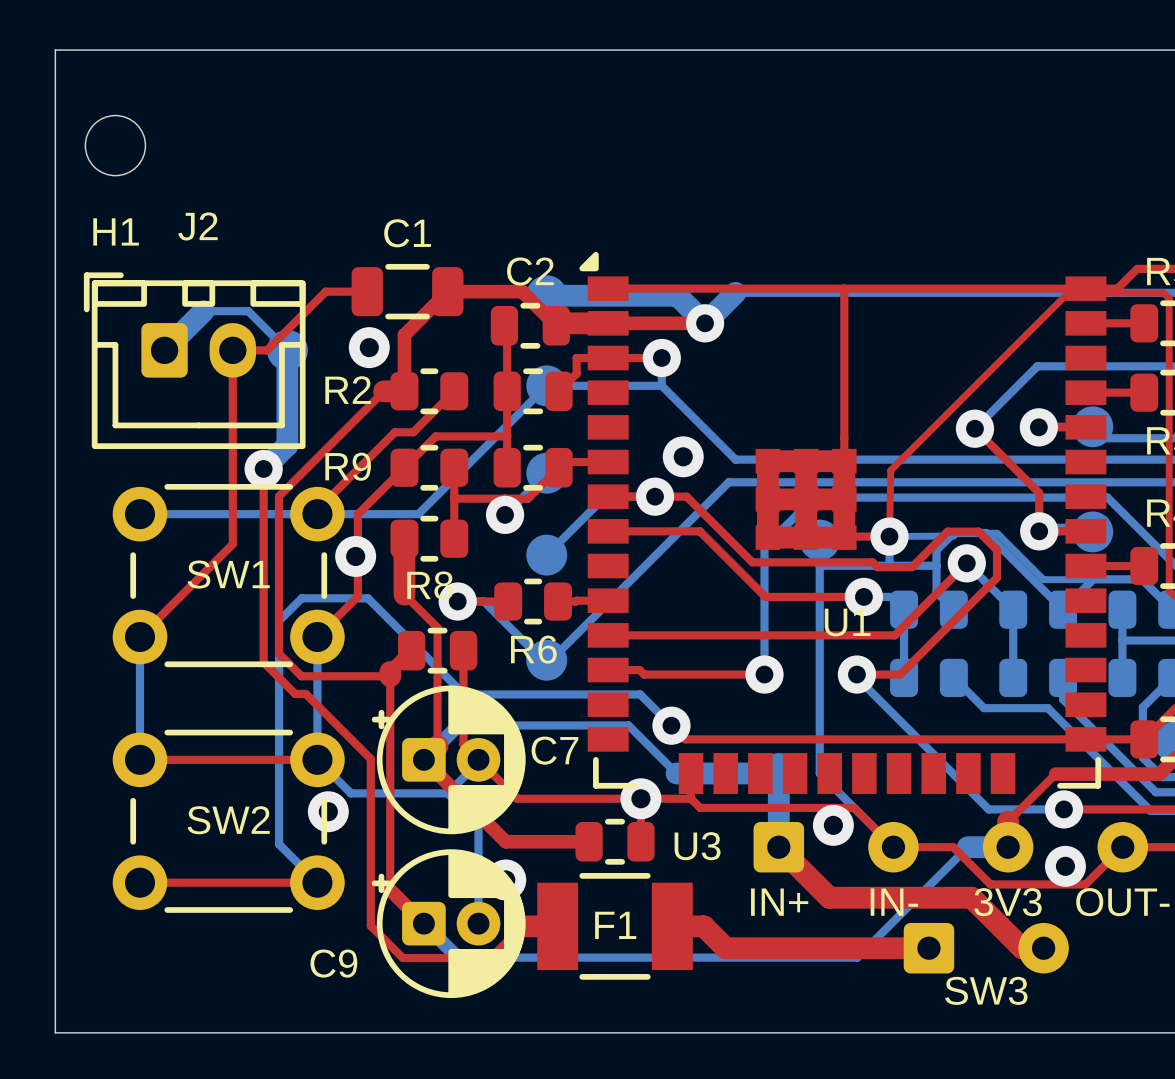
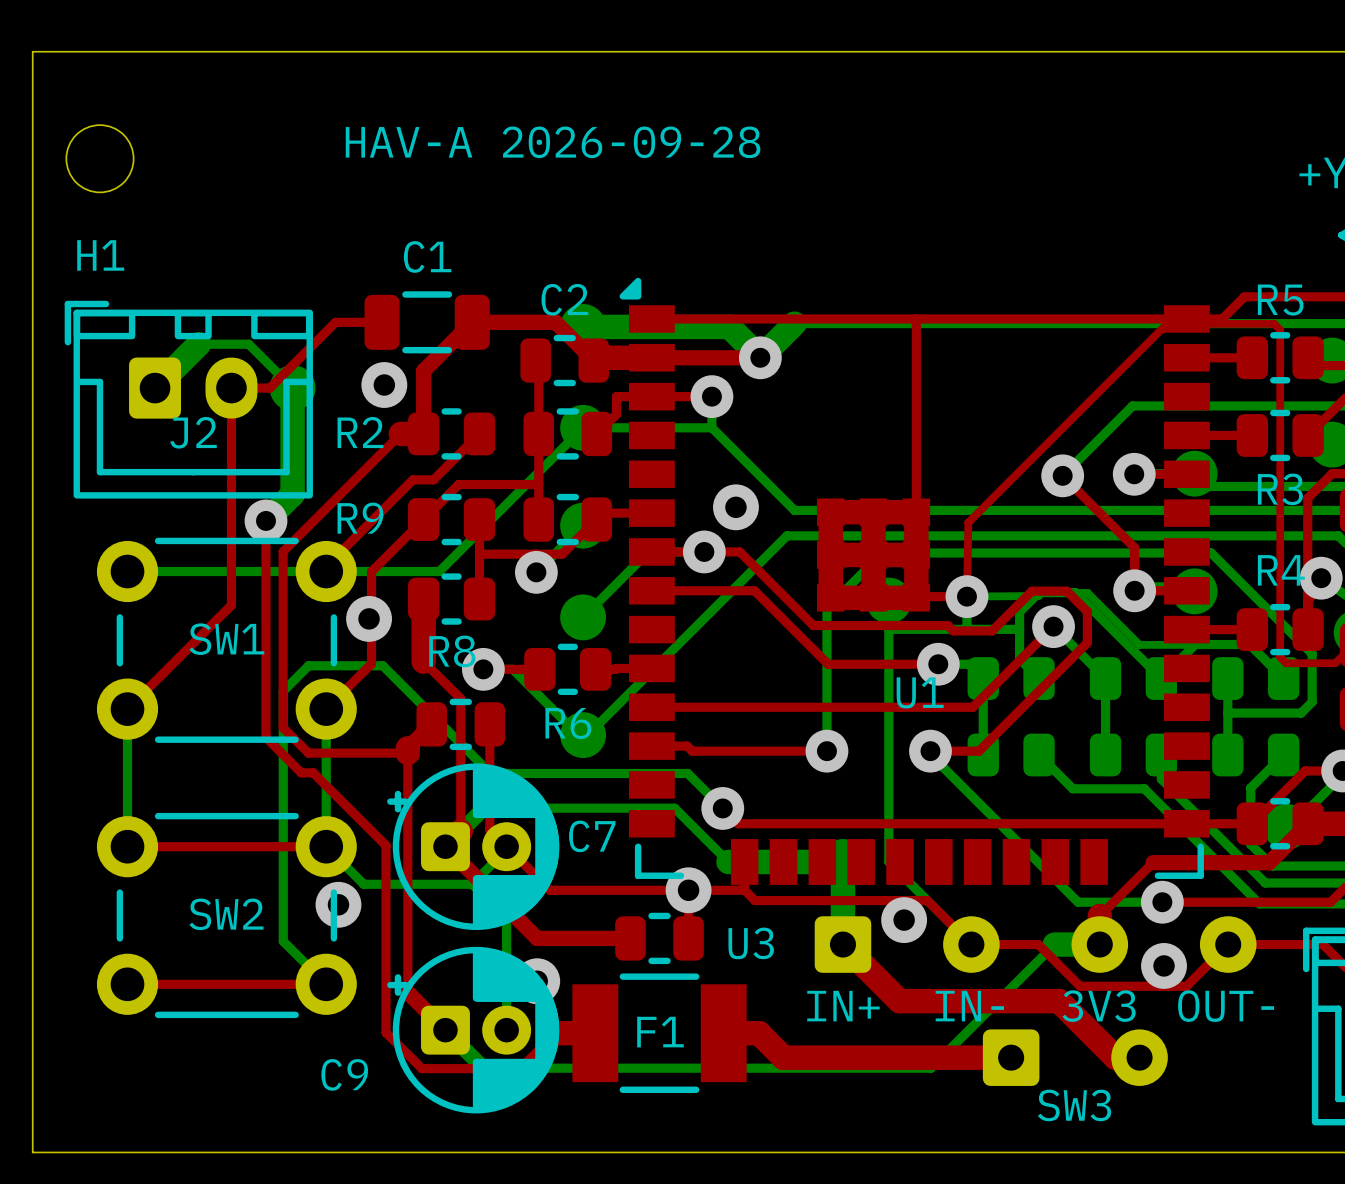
text: none -> HAV-A 2026-09-28 (553, 142)
J2 name position: J2 (198, 226) -> J2 (193, 432)

